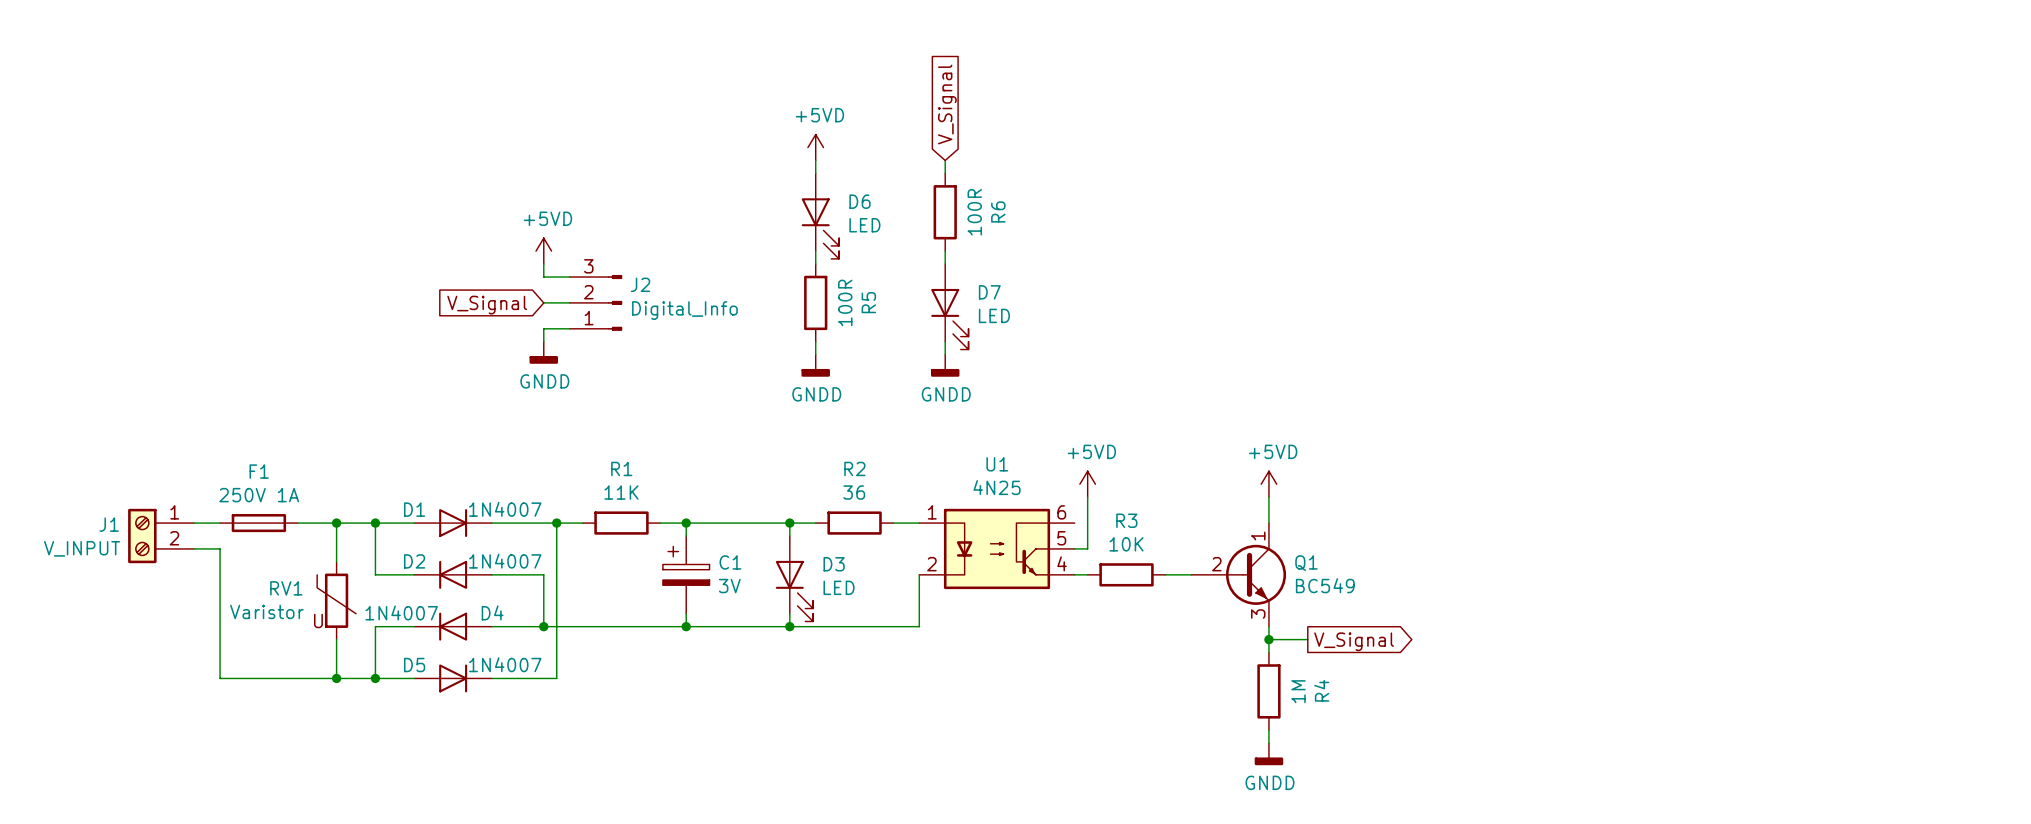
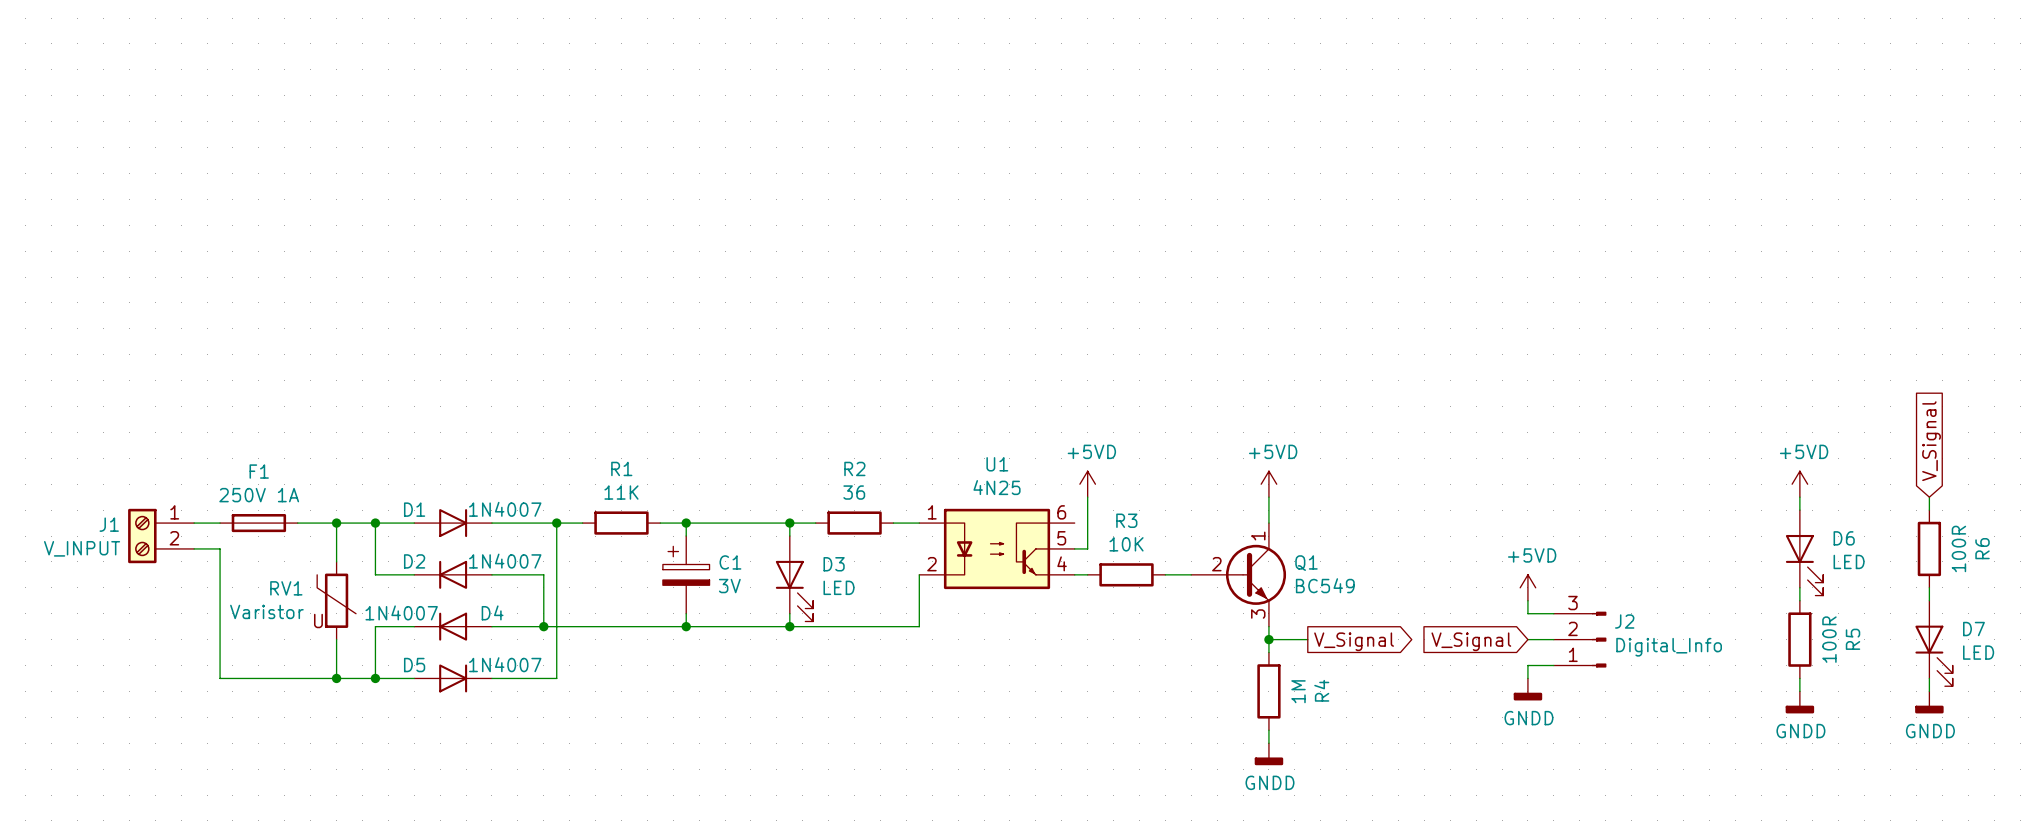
global label: V_Signal (947, 104) -> none
power symbol: +5VD (815, 147) -> none
wire: (815, 160) (815, 173) -> none
wire: (945, 160) (945, 173) -> none
R6 position: (945, 212) -> (1929, 548)
D6 position: (820, 216) -> (1804, 552)
power symbol: +5VD (543, 251) -> none
wire: (815, 251) (815, 264) -> none
wire: (945, 251) (945, 264) -> none
wire: (543, 264) (543, 277) (569, 277) -> none
wire: (543, 302) (569, 302) -> none
J2 position: (595, 302) -> (1580, 639)
R5 position: (815, 302) -> (1799, 639)
global label: V_Signal (487, 305) -> none
D7 position: (949, 306) -> (1934, 643)
wire: (569, 328) (543, 328) (543, 341) -> none
wire: (815, 341) (815, 354) -> none
wire: (945, 341) (945, 354) -> none
power symbol: GNDD (543, 352) -> none
power symbol: GNDD (815, 365) -> none
power symbol: GNDD (945, 365) -> none
global label: none -> V_Signal (1931, 441)
power symbol: none -> +5VD (1799, 484)
wire: none -> (1799, 497) (1799, 510)
wire: none -> (1929, 497) (1929, 510)
power symbol: none -> +5VD (1527, 587)
wire: none -> (1799, 587) (1799, 600)
wire: none -> (1929, 587) (1929, 600)
wire: none -> (1527, 600) (1527, 613) (1553, 613)
wire: none -> (1527, 639) (1553, 639)
global label: none -> V_Signal (1471, 641)
wire: none -> (1553, 665) (1527, 665) (1527, 678)
wire: none -> (1799, 678) (1799, 691)
wire: none -> (1929, 678) (1929, 691)
power symbol: none -> GNDD (1527, 689)
power symbol: none -> GNDD (1799, 702)
power symbol: none -> GNDD (1929, 702)

